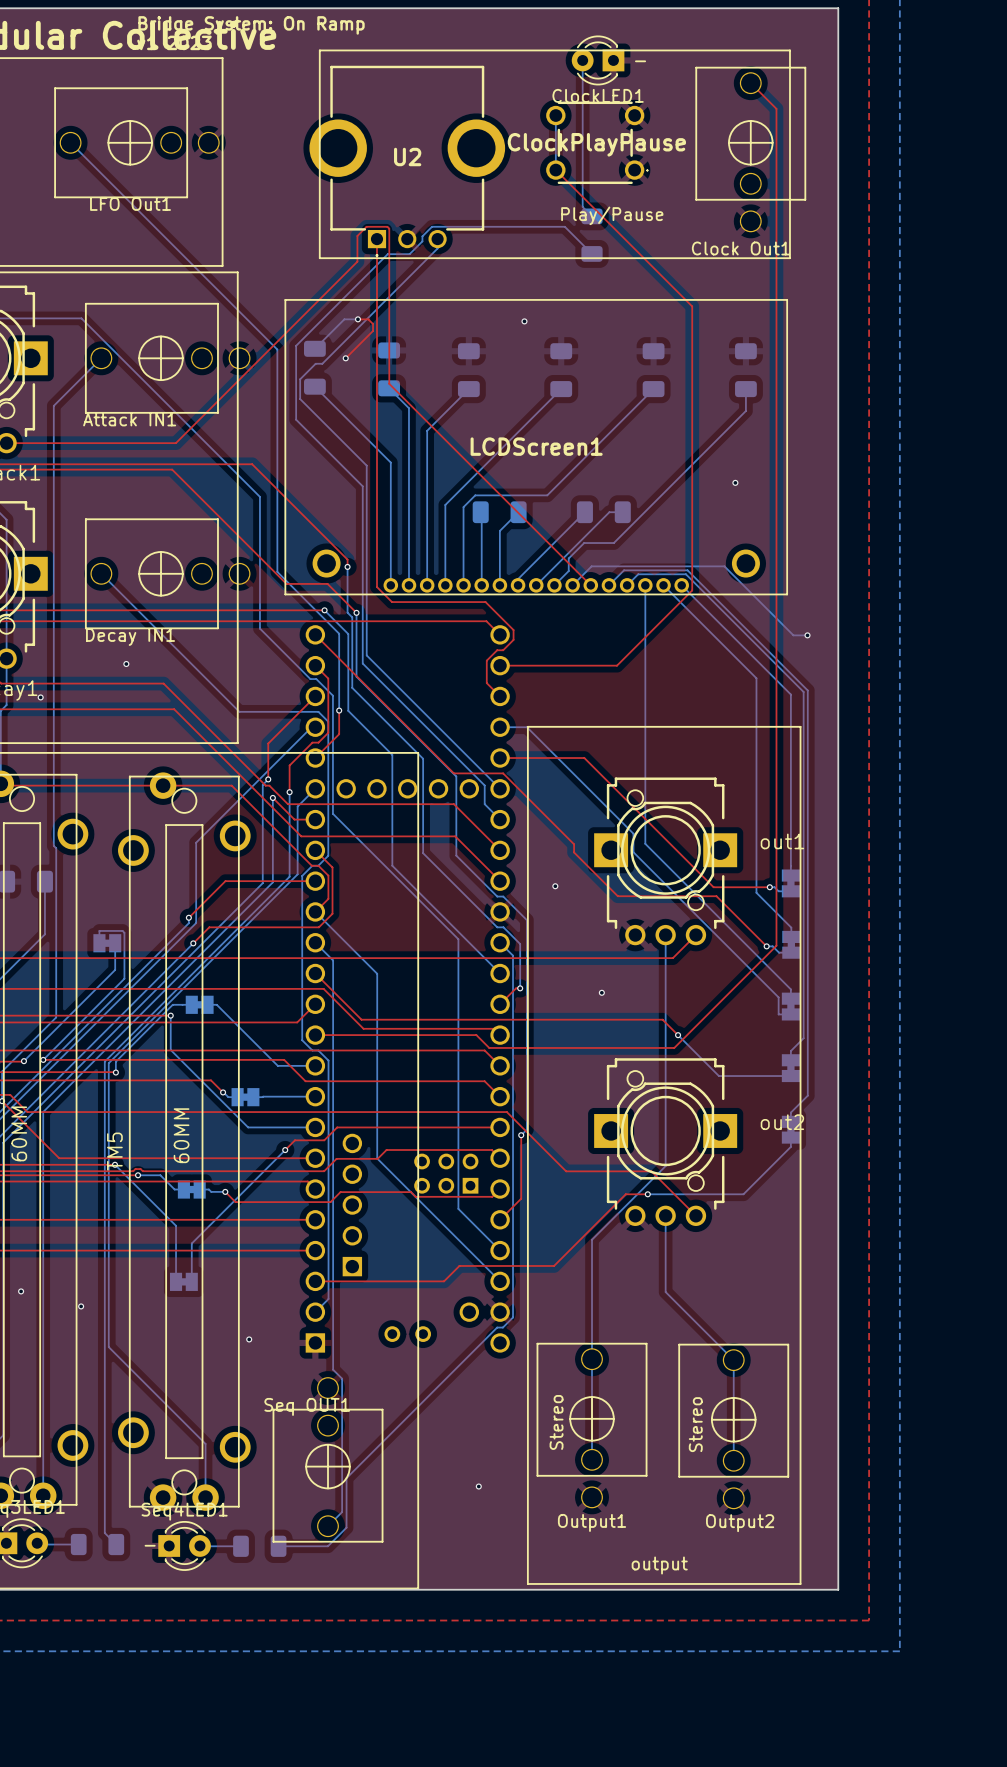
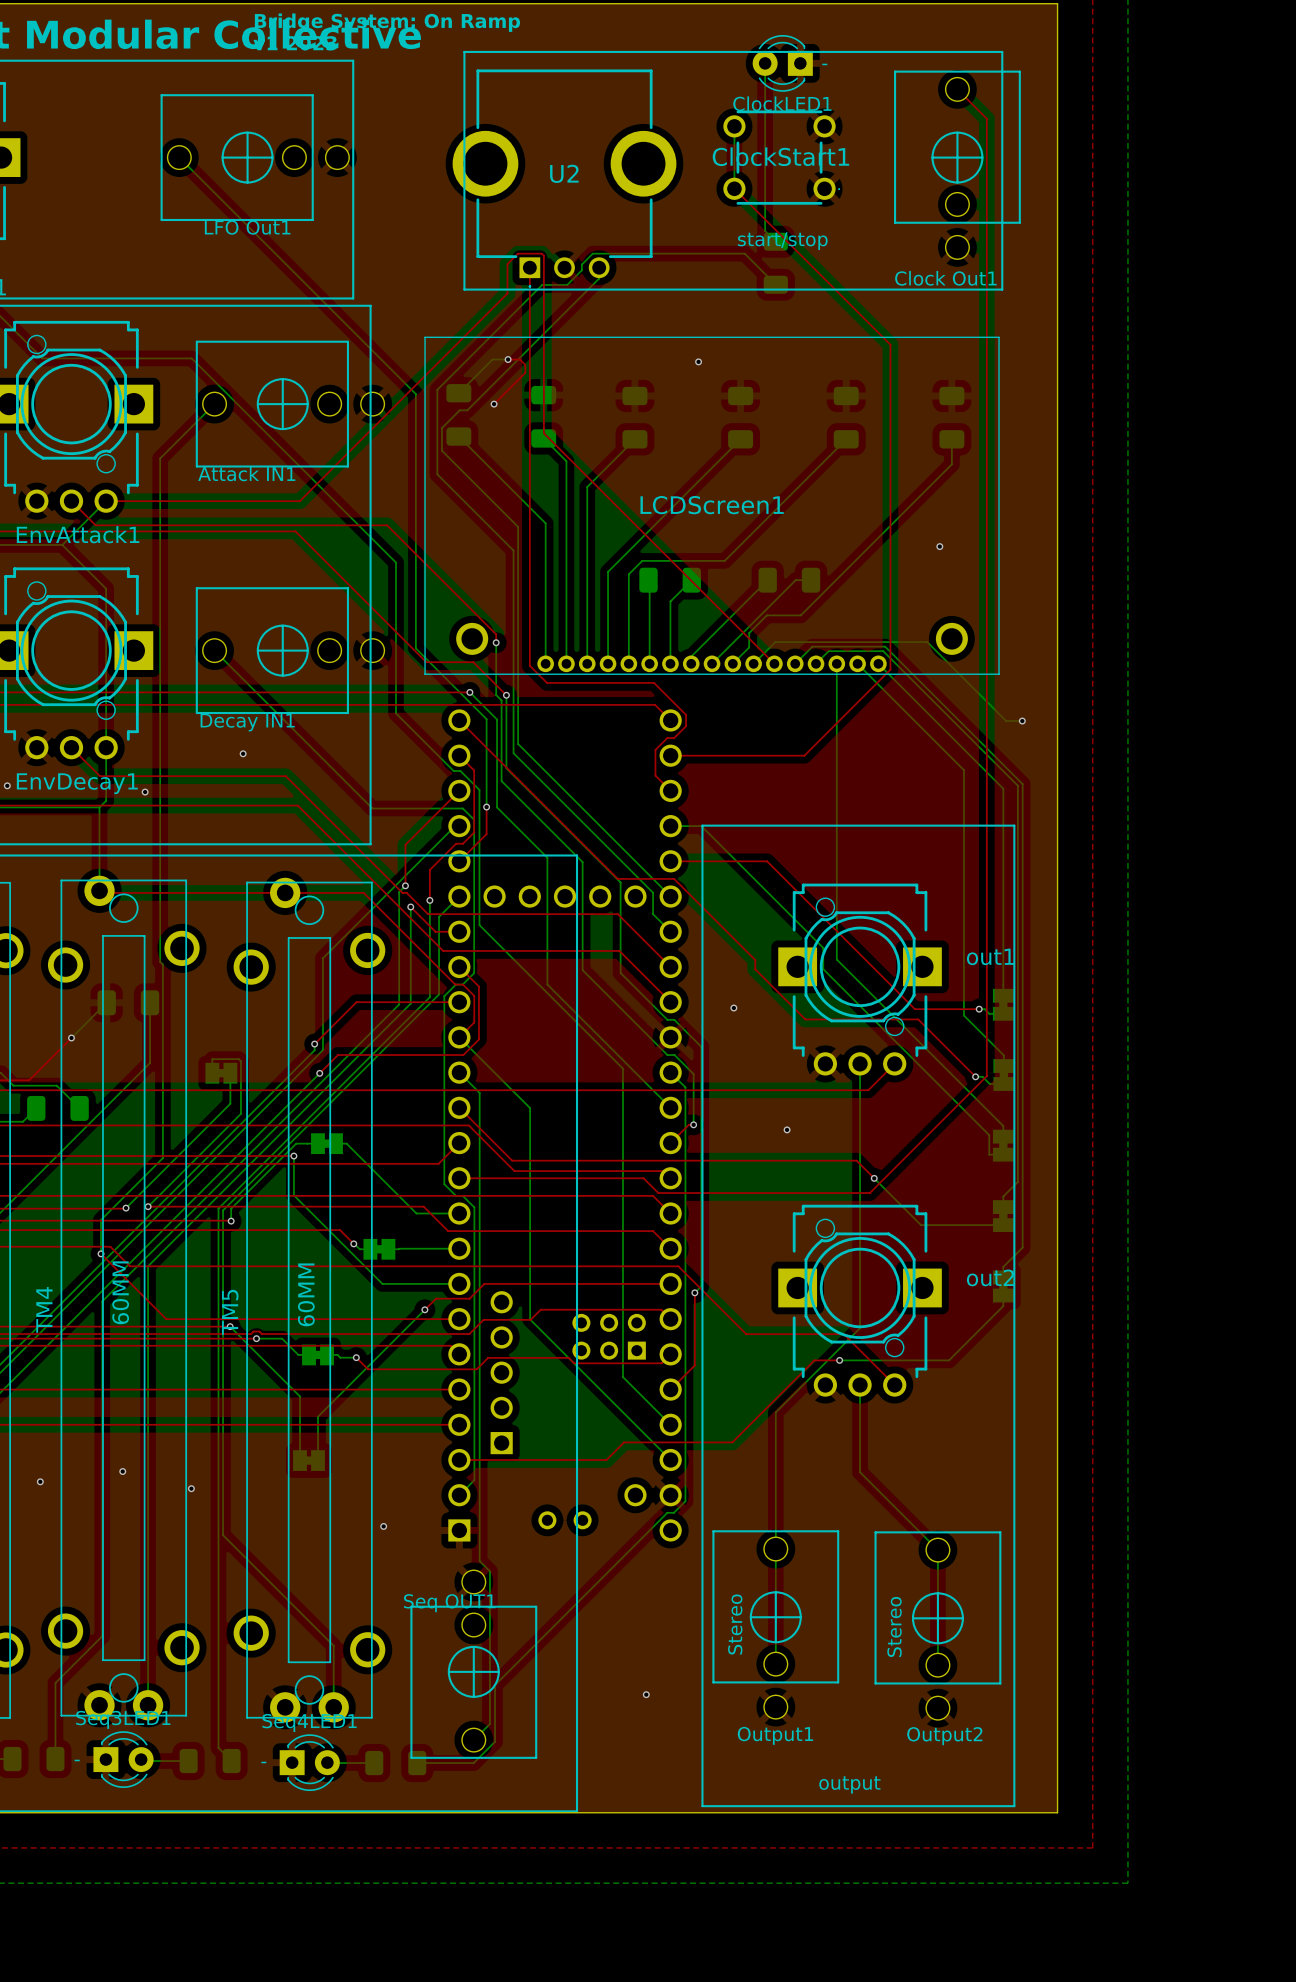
ClockPlayPause name: ClockPlayPause (596, 144) -> ClockStart1 (780, 156)
text: Play/Pause (612, 215) -> start/stop (782, 241)

